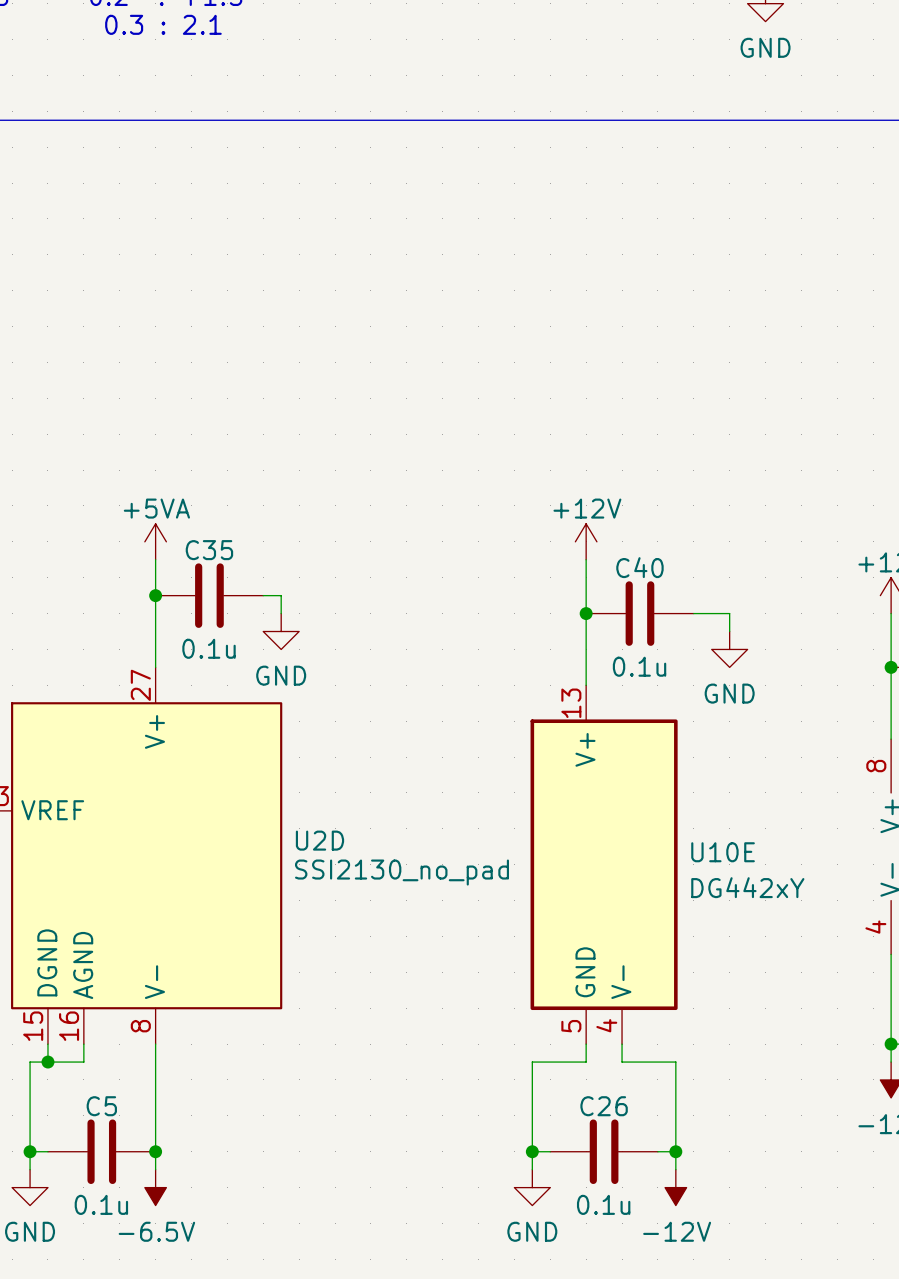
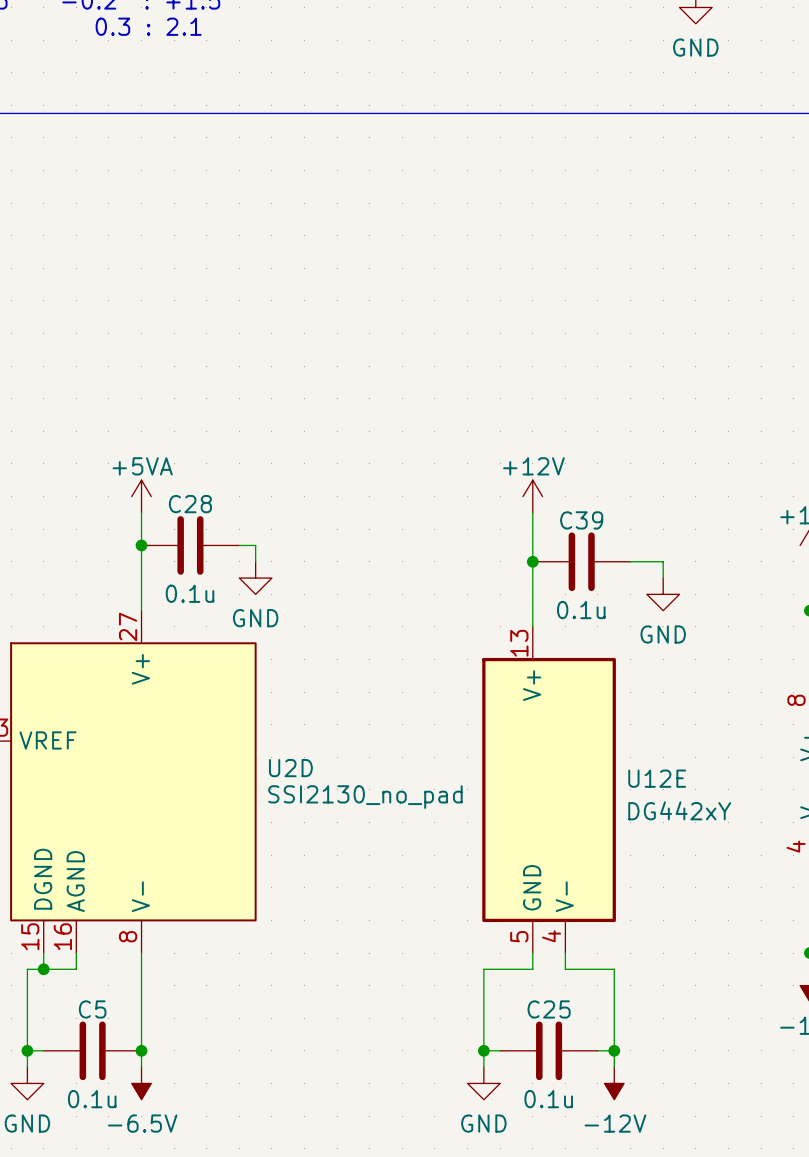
C35 name: C35 (209, 550) -> C28 (190, 504)
C40 name: C40 (639, 567) -> C39 (581, 520)
U10E name: U10E (723, 852) -> U12E (657, 778)
C26 name: C26 (604, 1106) -> C25 (549, 1009)

